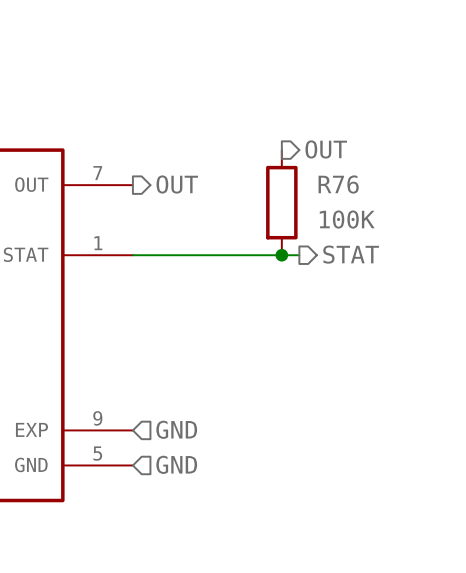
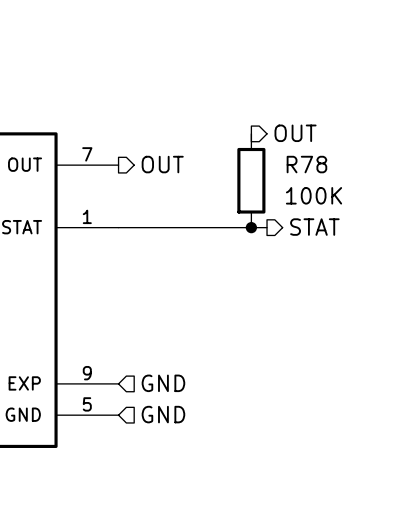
R76 name: R76 (338, 184) -> R78 (306, 164)

